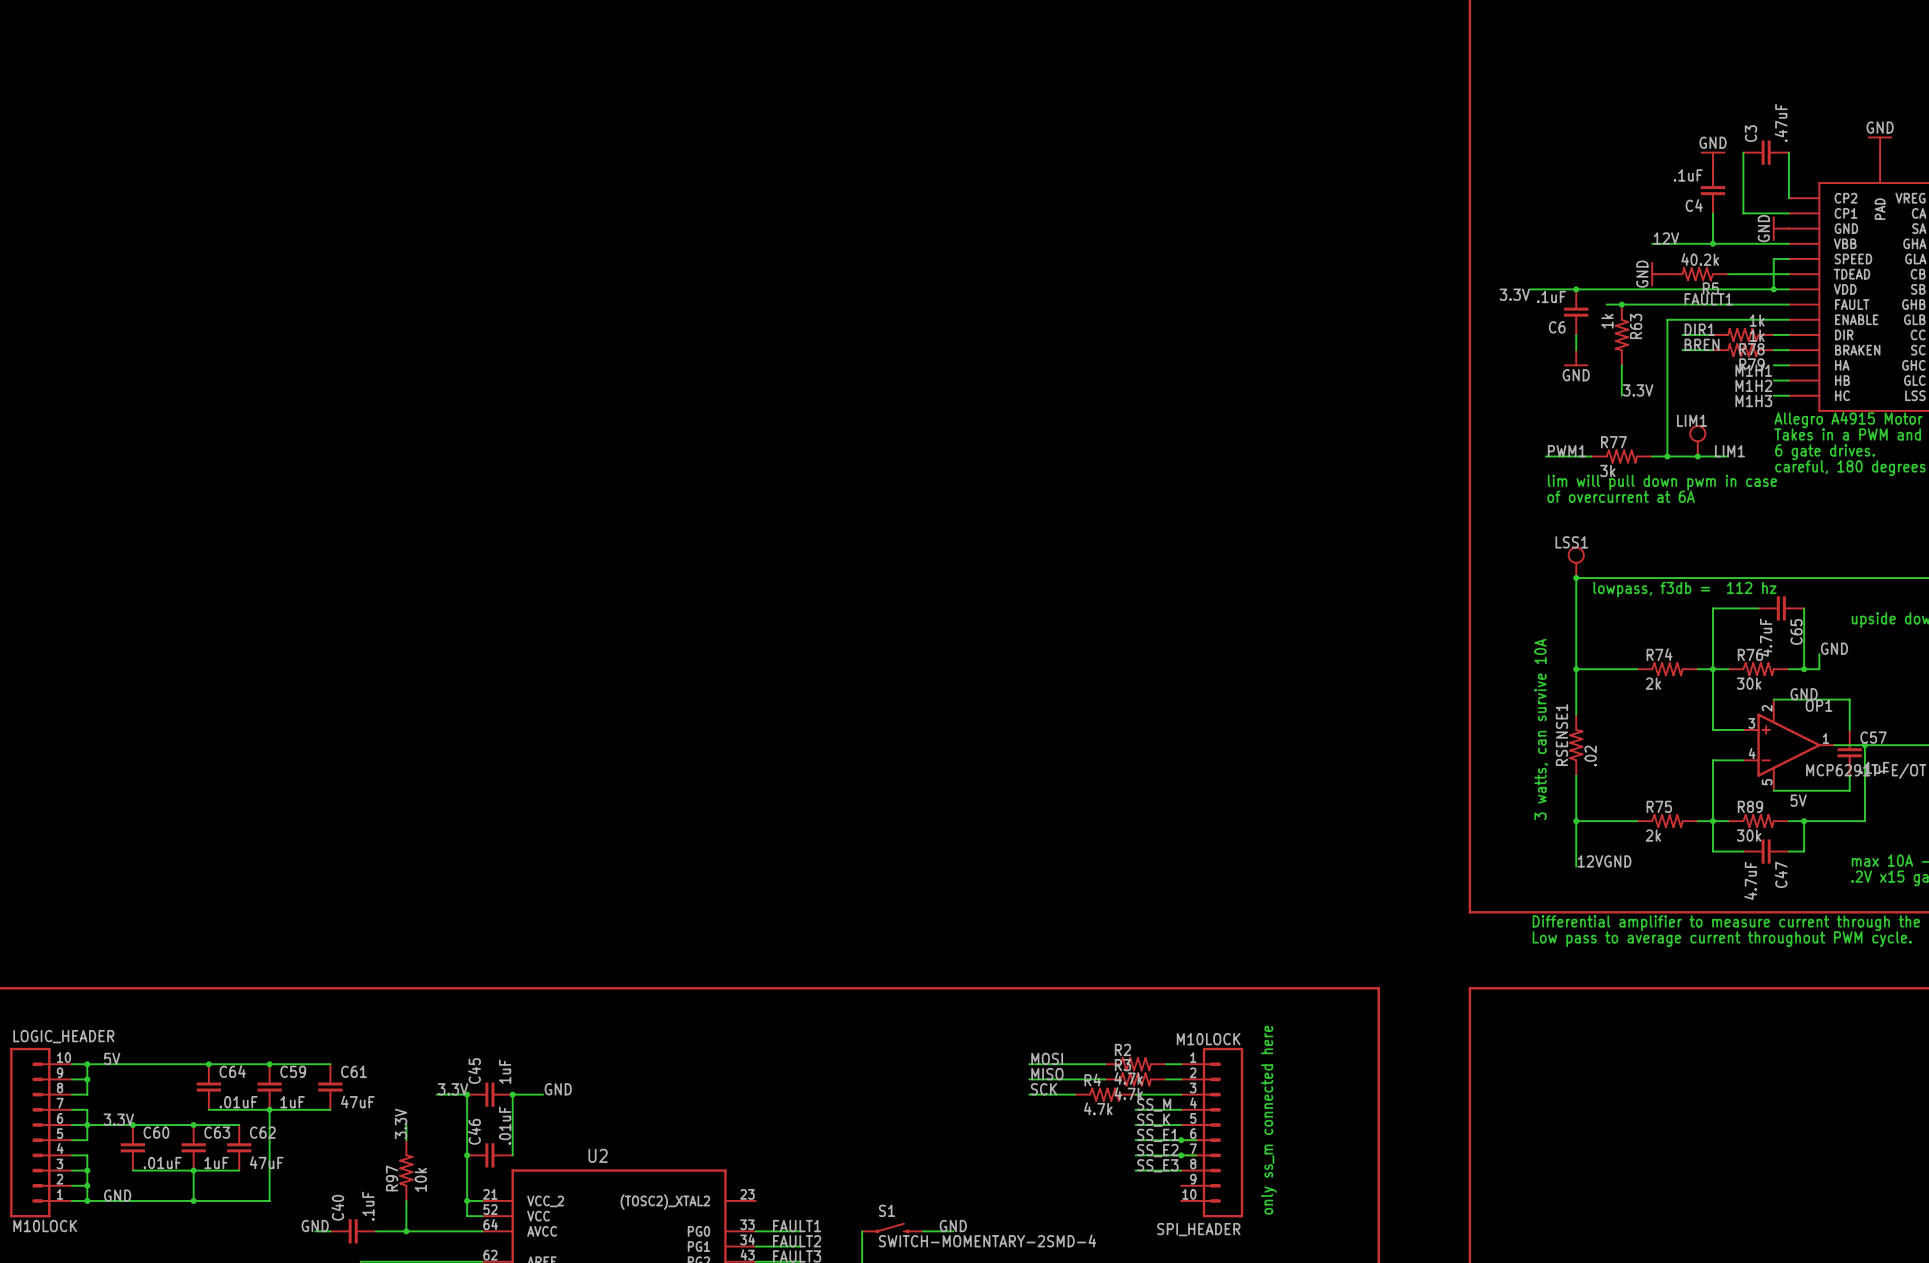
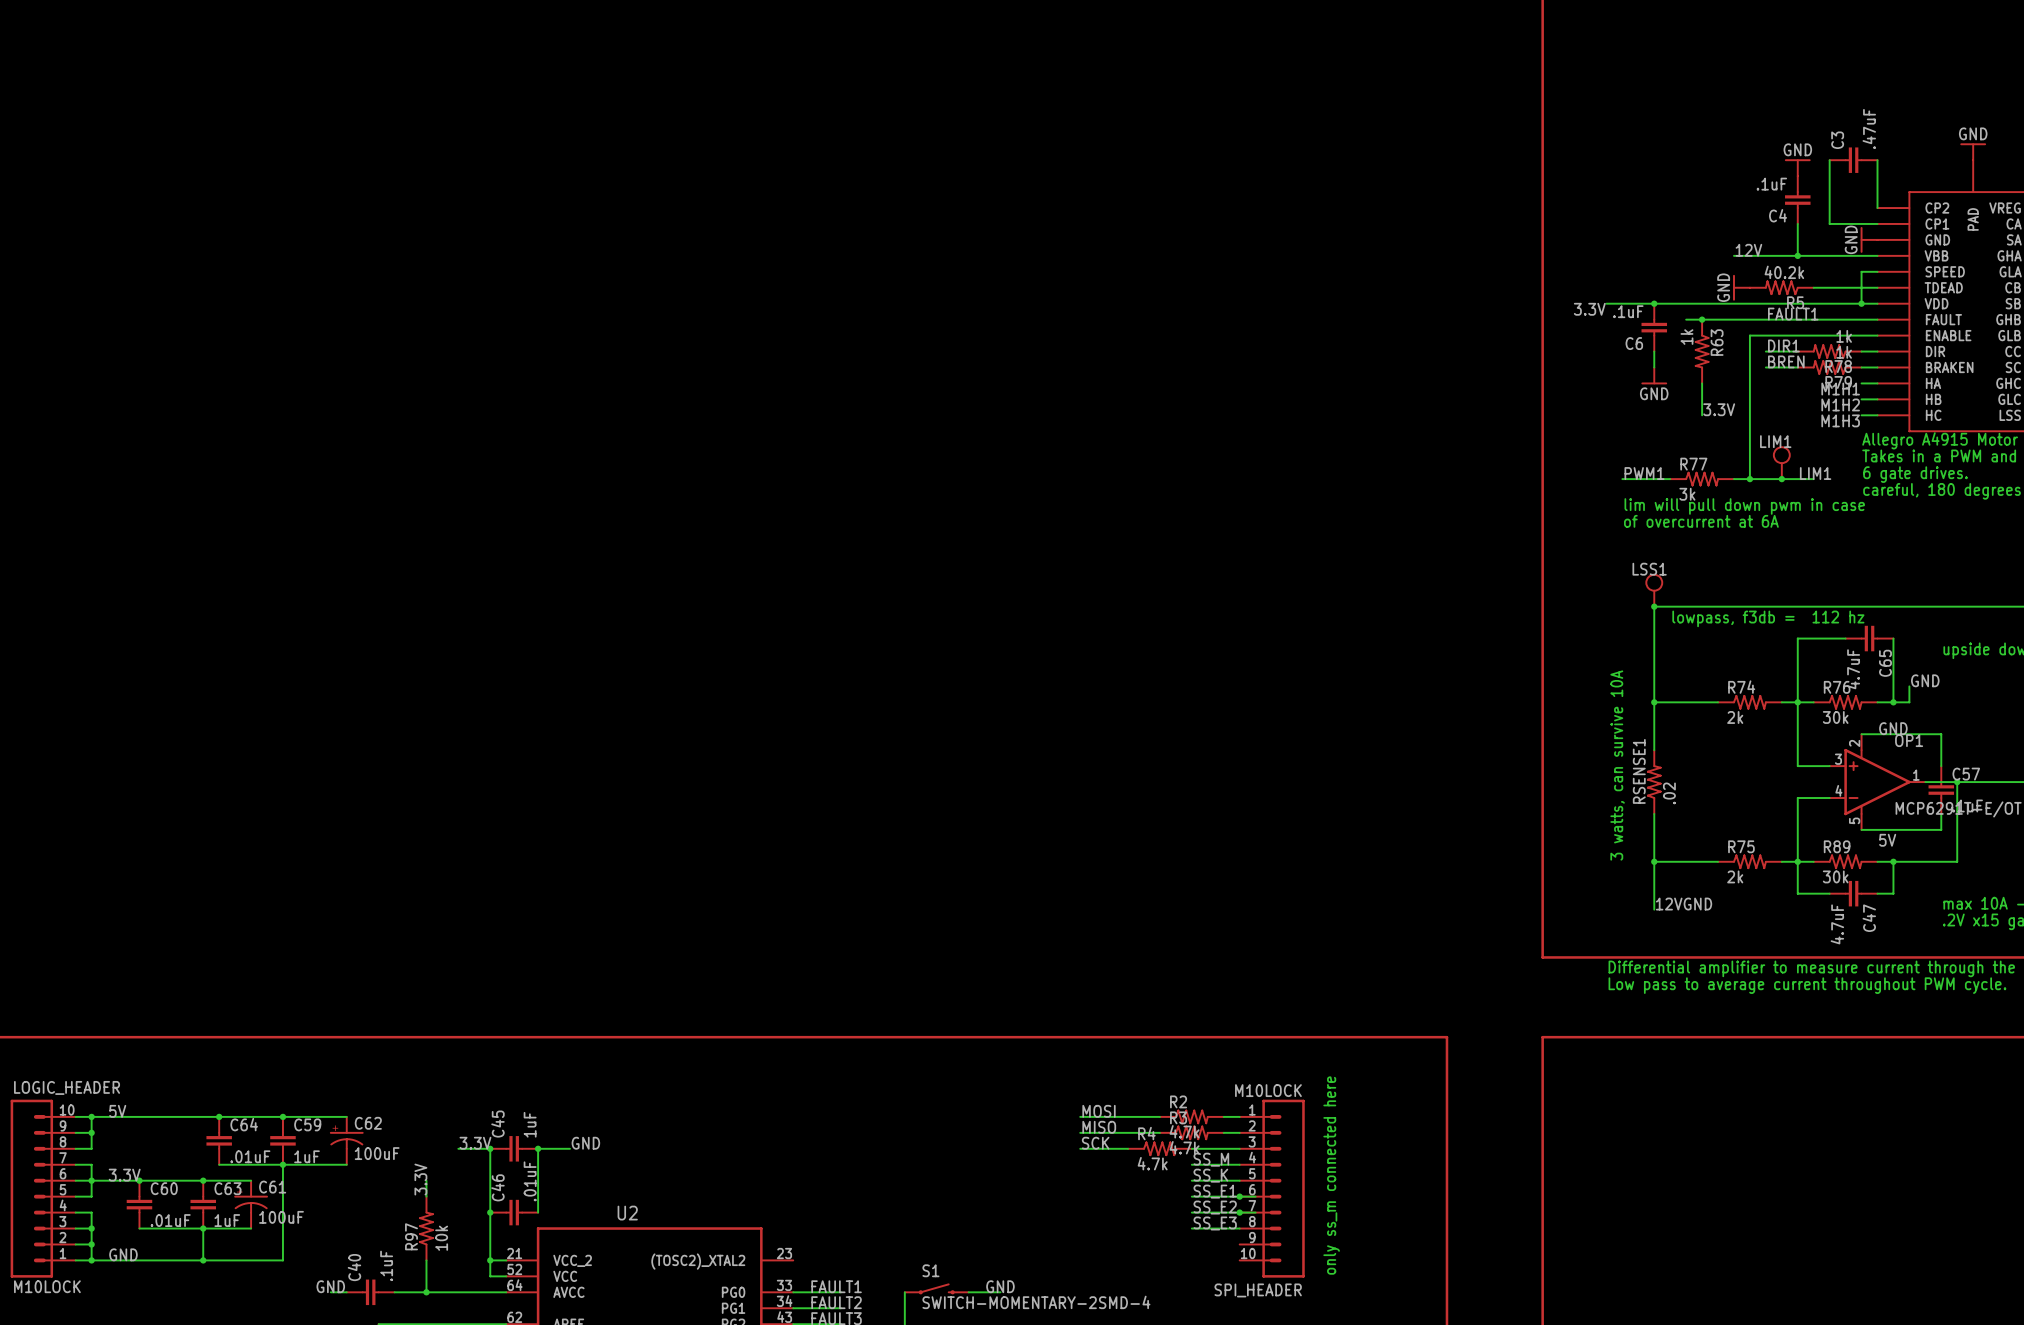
C61 symbol: [318, 1064, 343, 1110] -> [234, 1180, 268, 1229]
C61 value: 47uF (357, 1101) -> 100uF (281, 1217)
C62 symbol: [227, 1125, 252, 1171] -> [330, 1116, 364, 1165]
C62 value: 47uF (266, 1162) -> 100uF (377, 1153)

